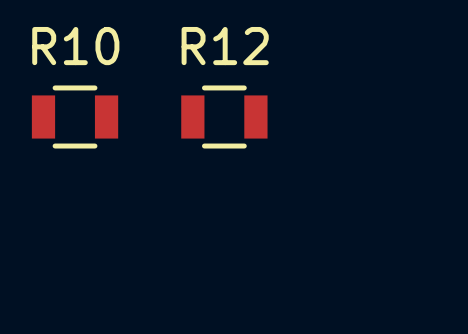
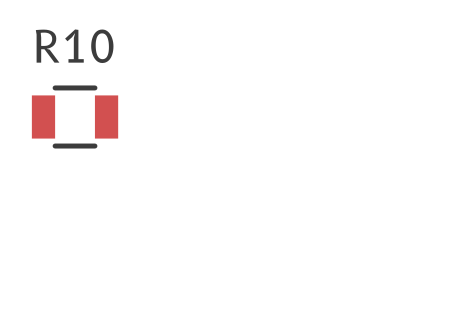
R12: (224, 116) -> none

